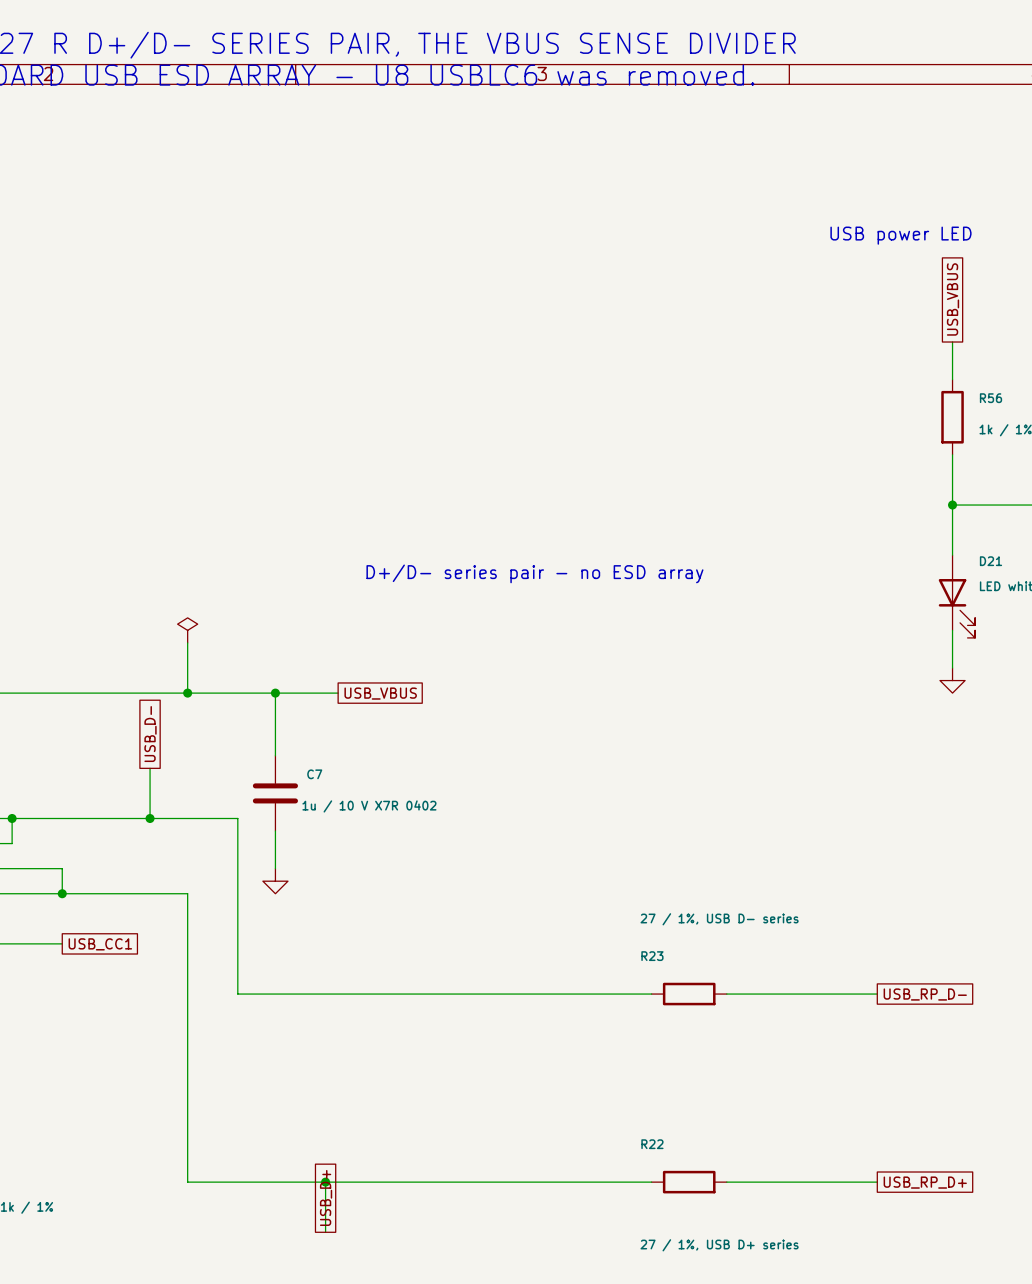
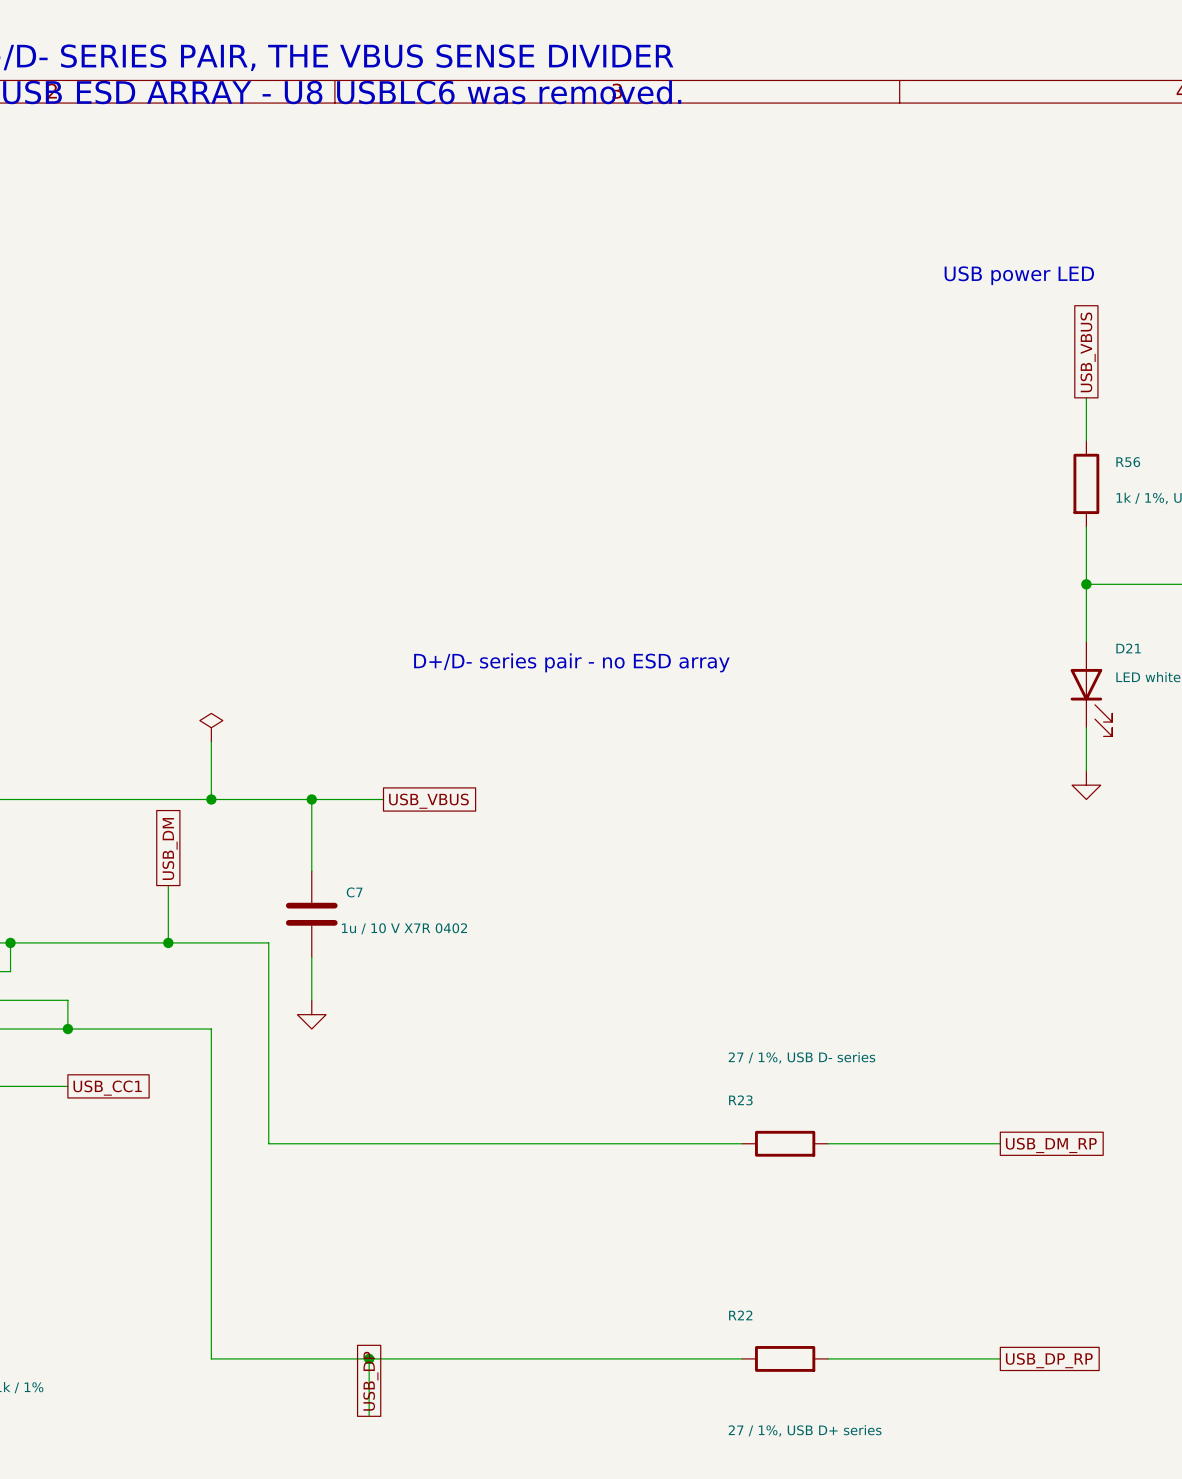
global label: USB_D- (150, 734) -> USB_DM (170, 848)
global label: USB_RP_D- (925, 994) -> USB_DM_RP (1051, 1145)
global label: USB_RP_D+ (925, 1182) -> USB_DP_RP (1049, 1360)
global label: USB_D+ (326, 1197) -> USB_DP (370, 1381)

